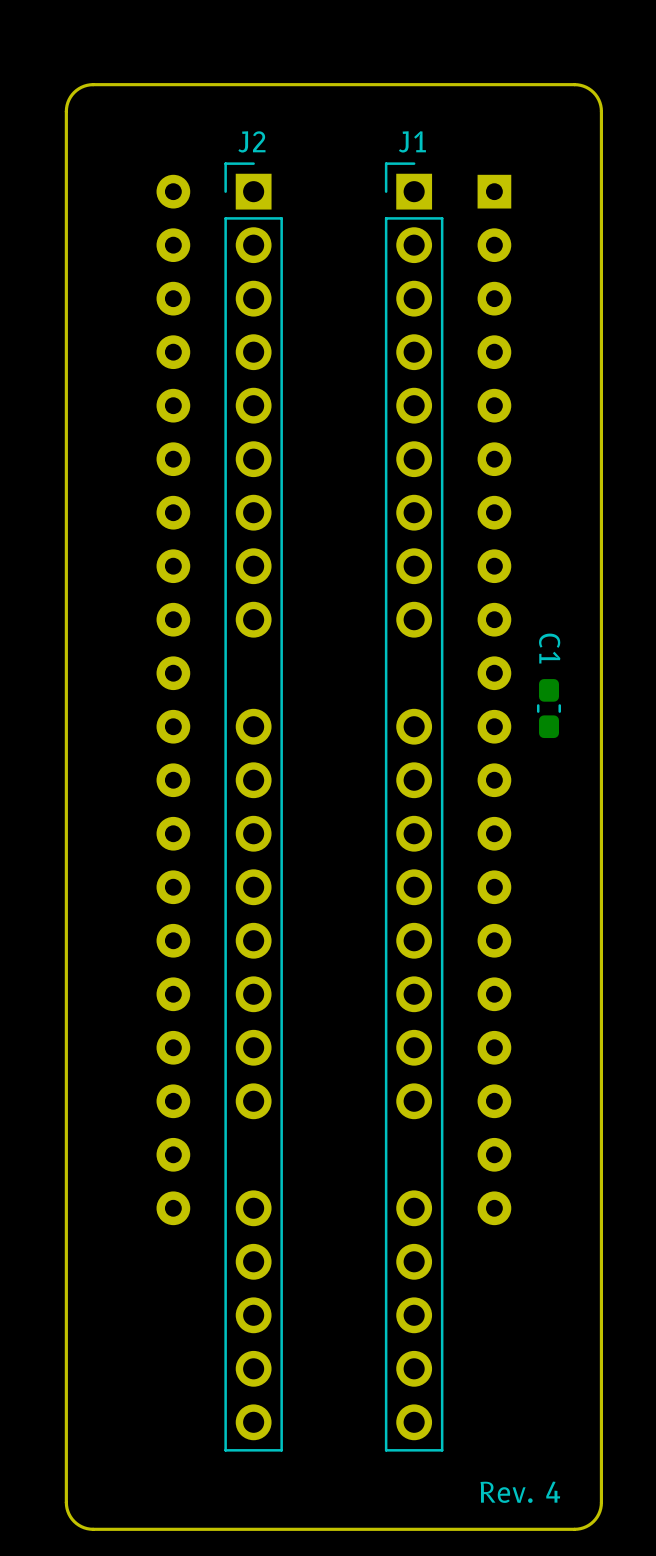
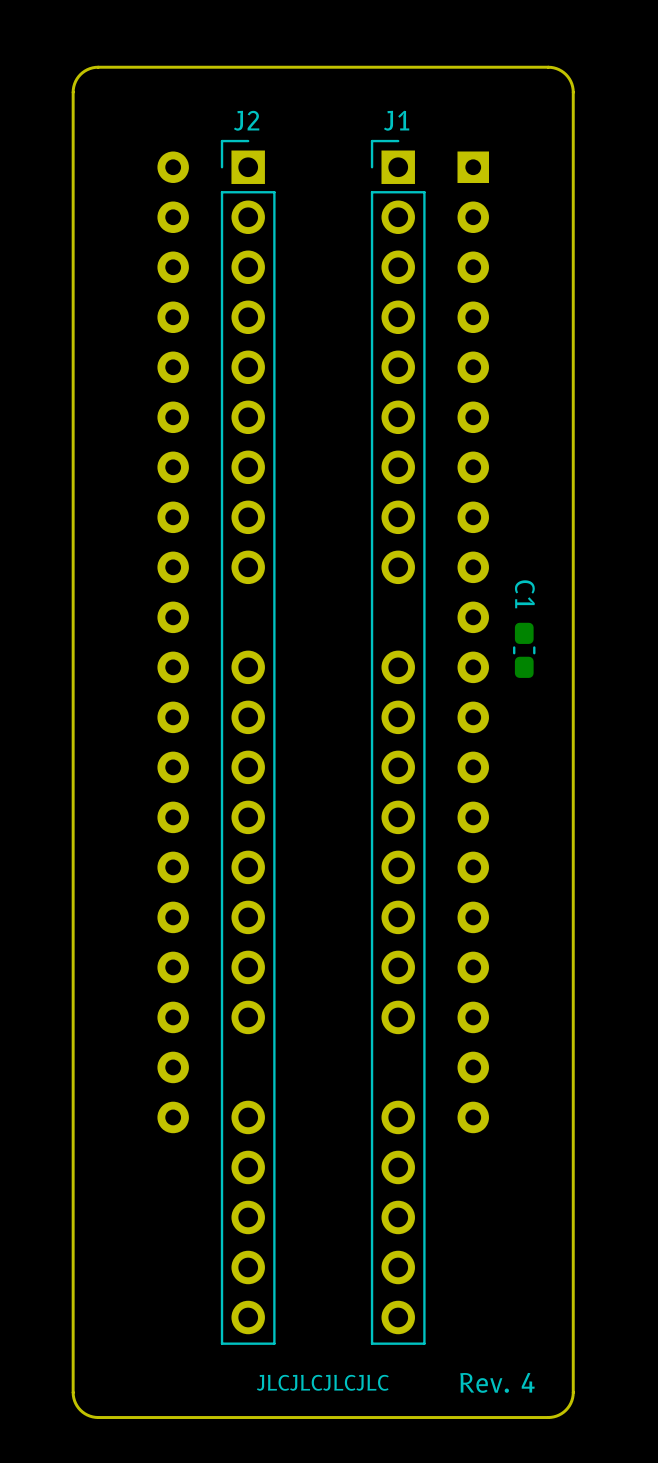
text: none -> JLCJLCJLCJLC (322, 1382)

